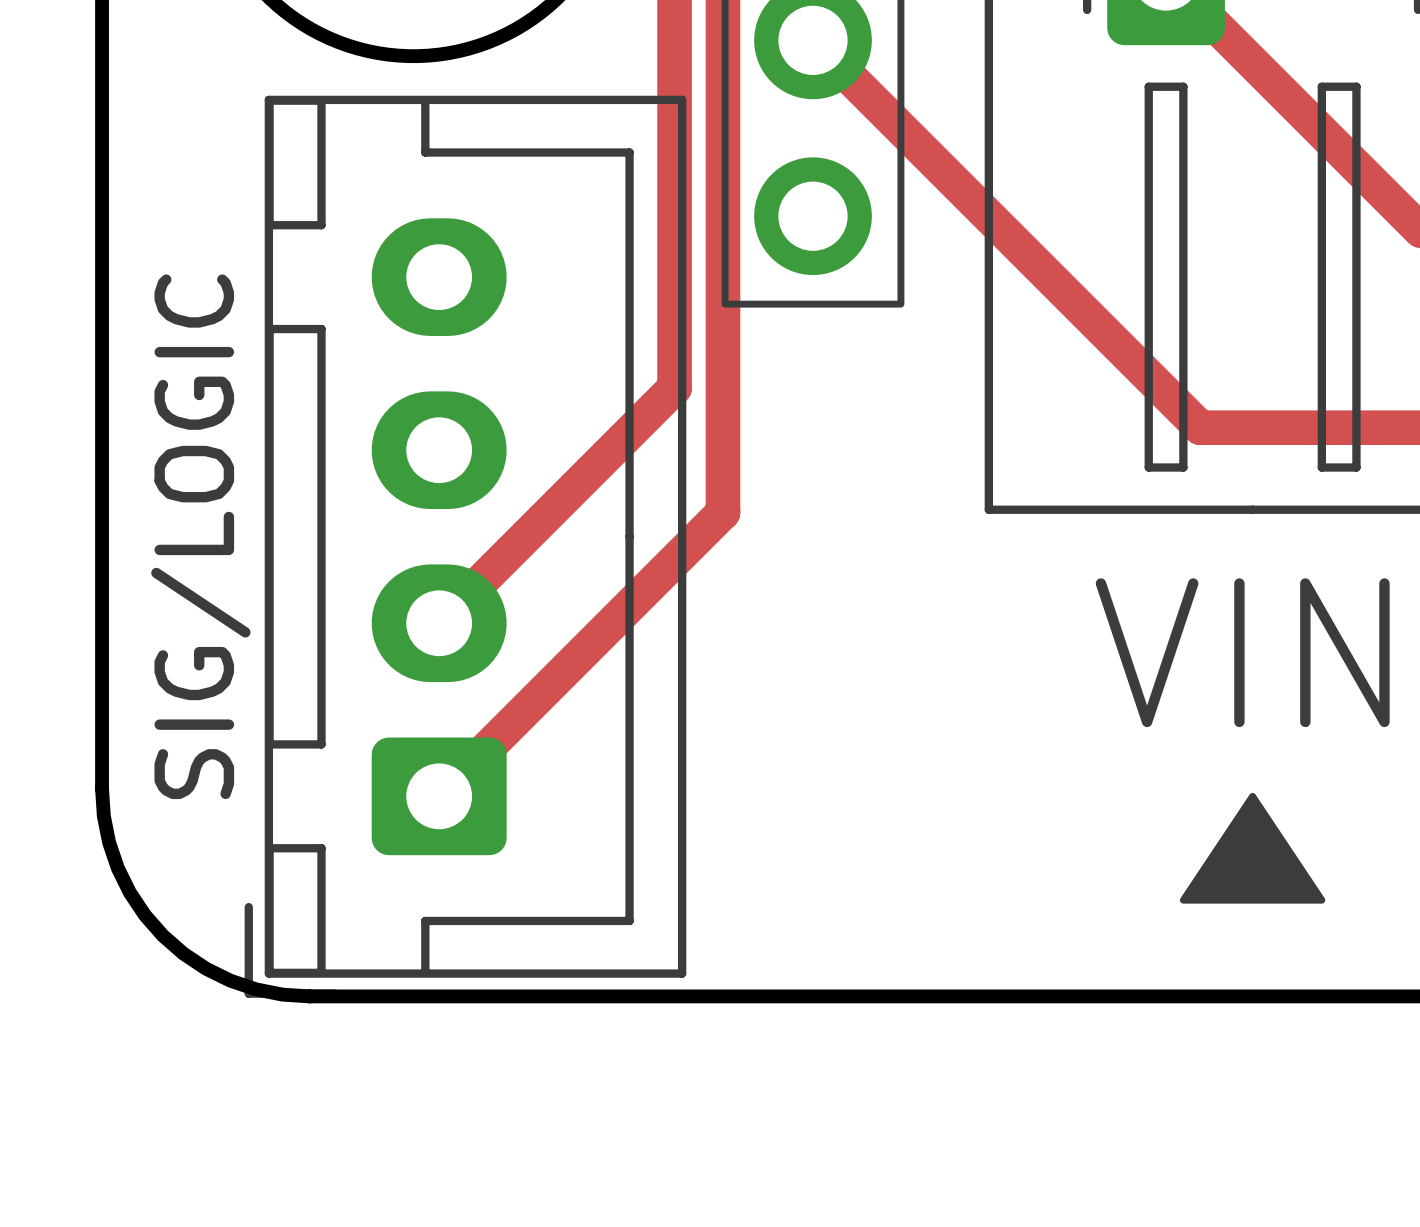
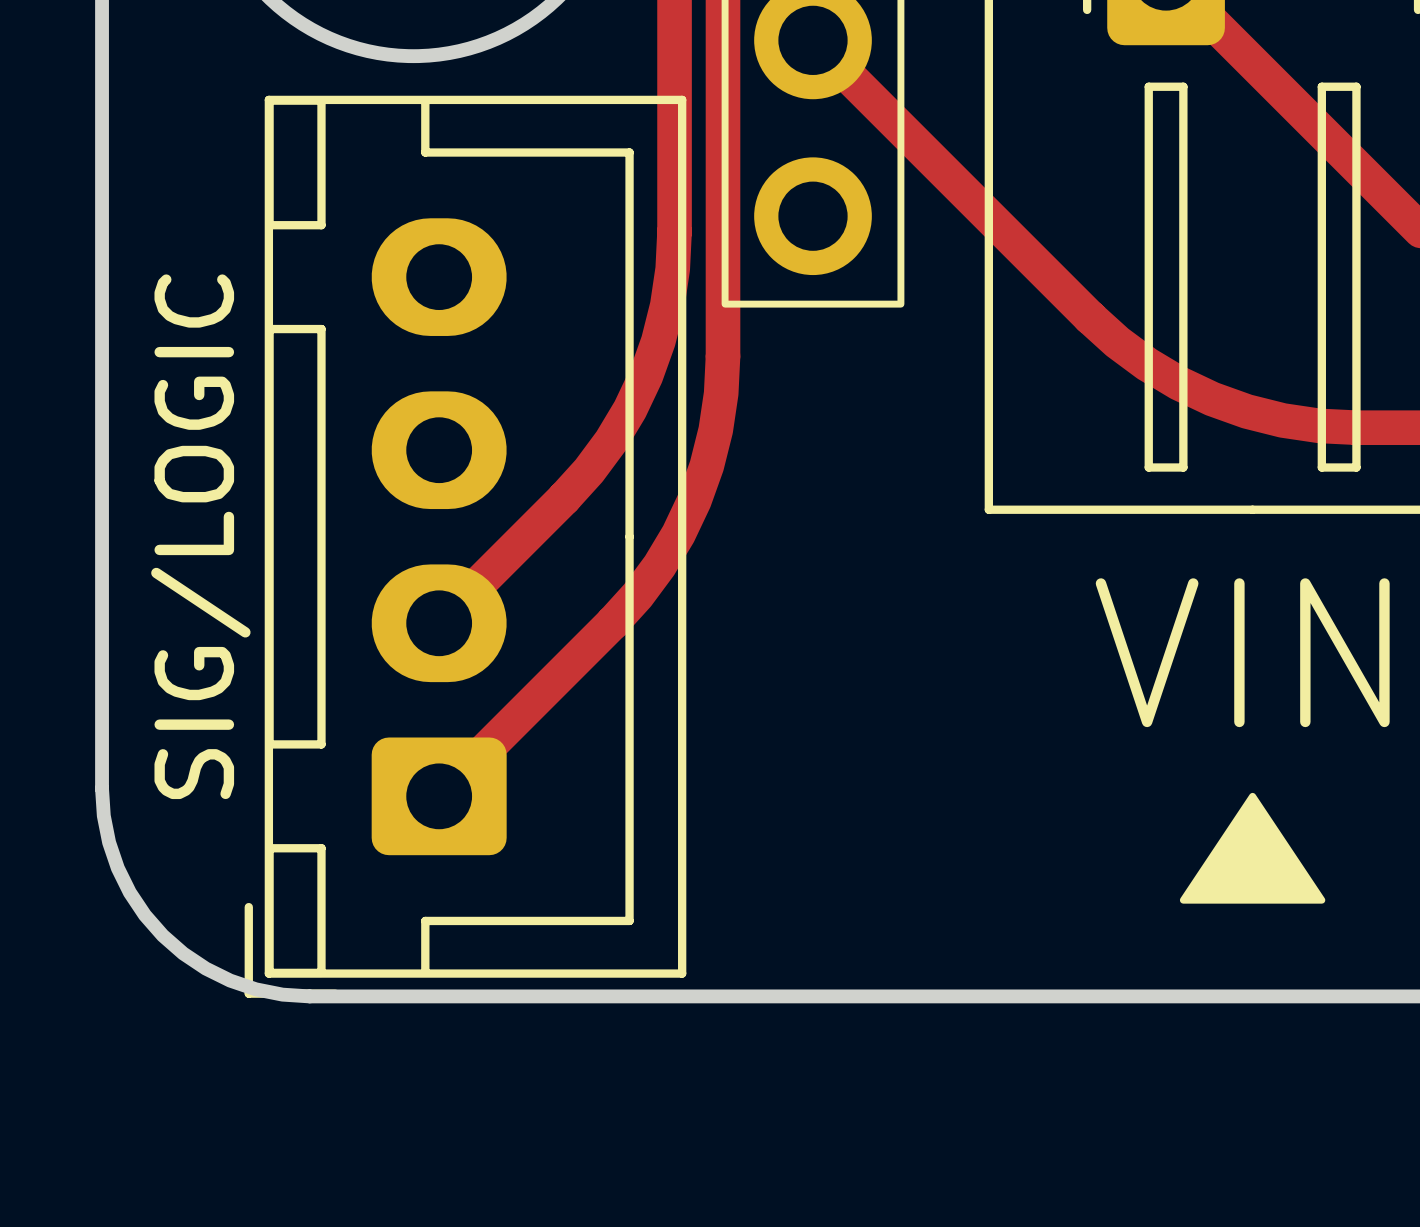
track: (674, 231) (674, 387) (564, 498) -> (674, 231) (672, 268) (667, 305) (658, 341) (645, 376) (630, 409) (611, 441) (589, 470) (564, 498)
track: (1090, 317) (1200, 427) (1356, 427) -> (1090, 317) (1117, 342) (1147, 364) (1178, 383) (1212, 399) (1247, 411) (1282, 420) (1319, 425) (1356, 427)
track: (723, 356) (723, 512) (612, 622) -> (723, 356) (721, 393) (715, 429) (706, 465) (694, 500) (678, 534) (659, 565) (637, 595) (612, 622)

